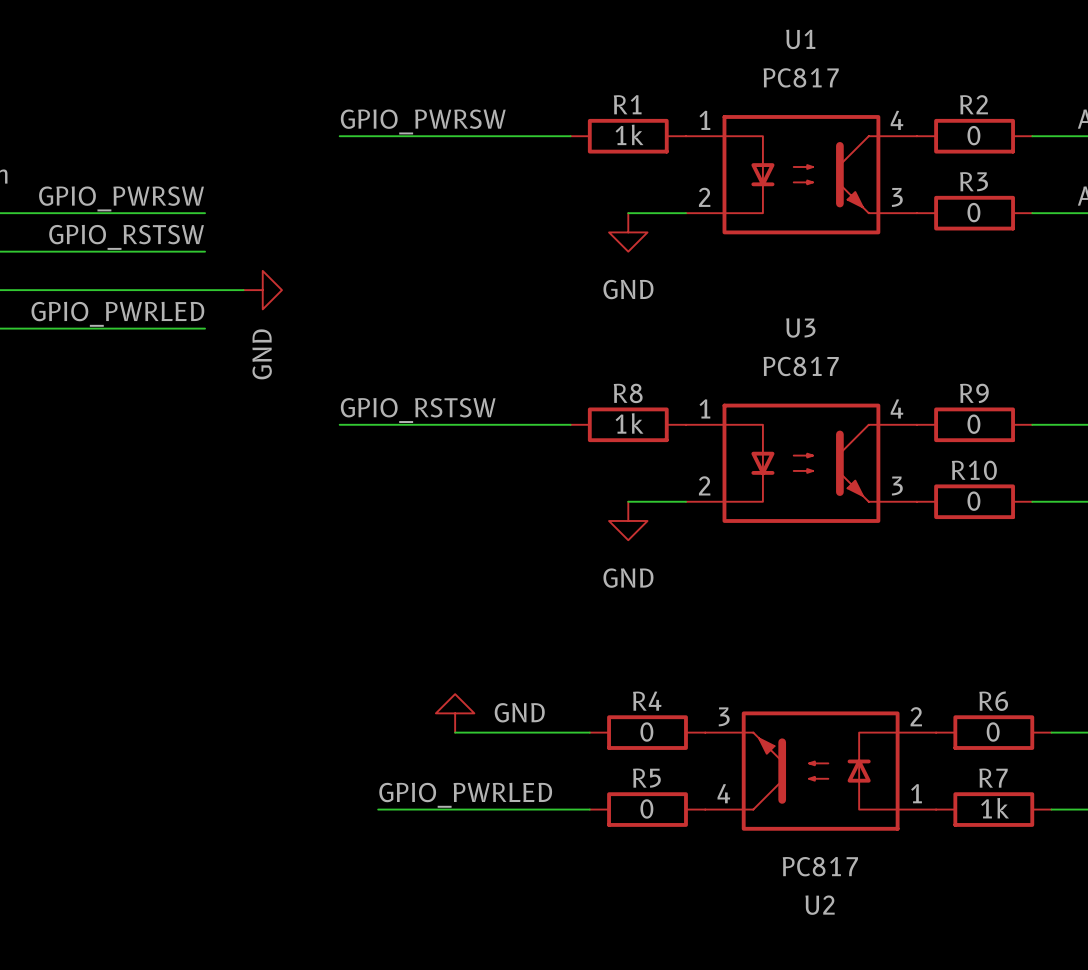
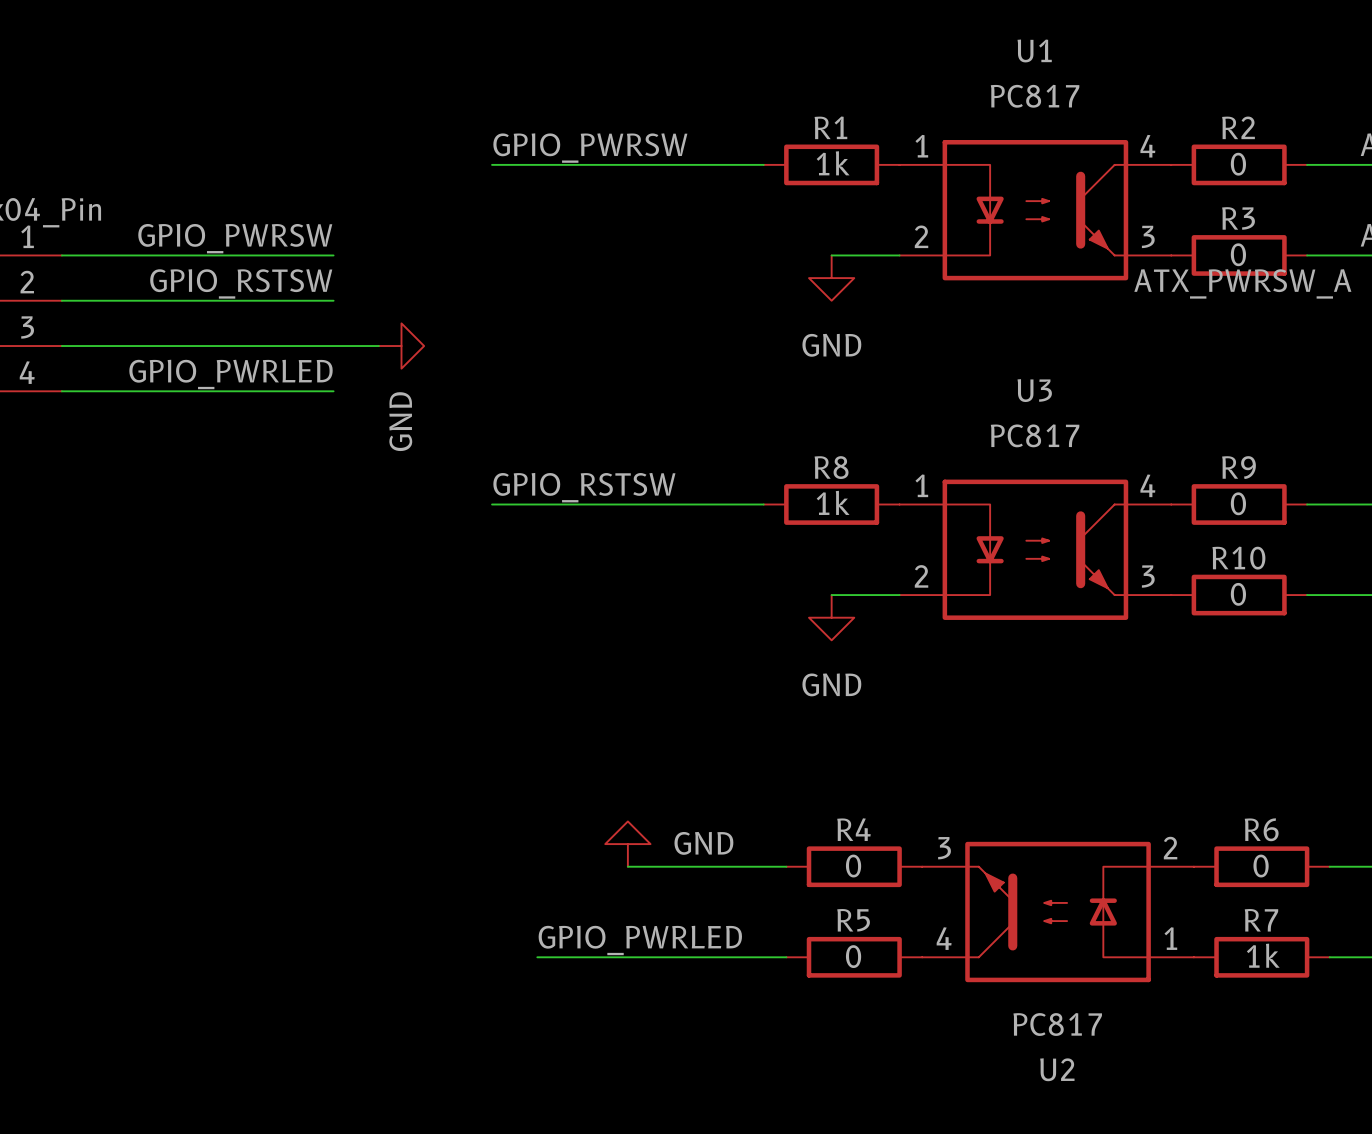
label: none -> ATX_PWRSW_A (1242, 283)

